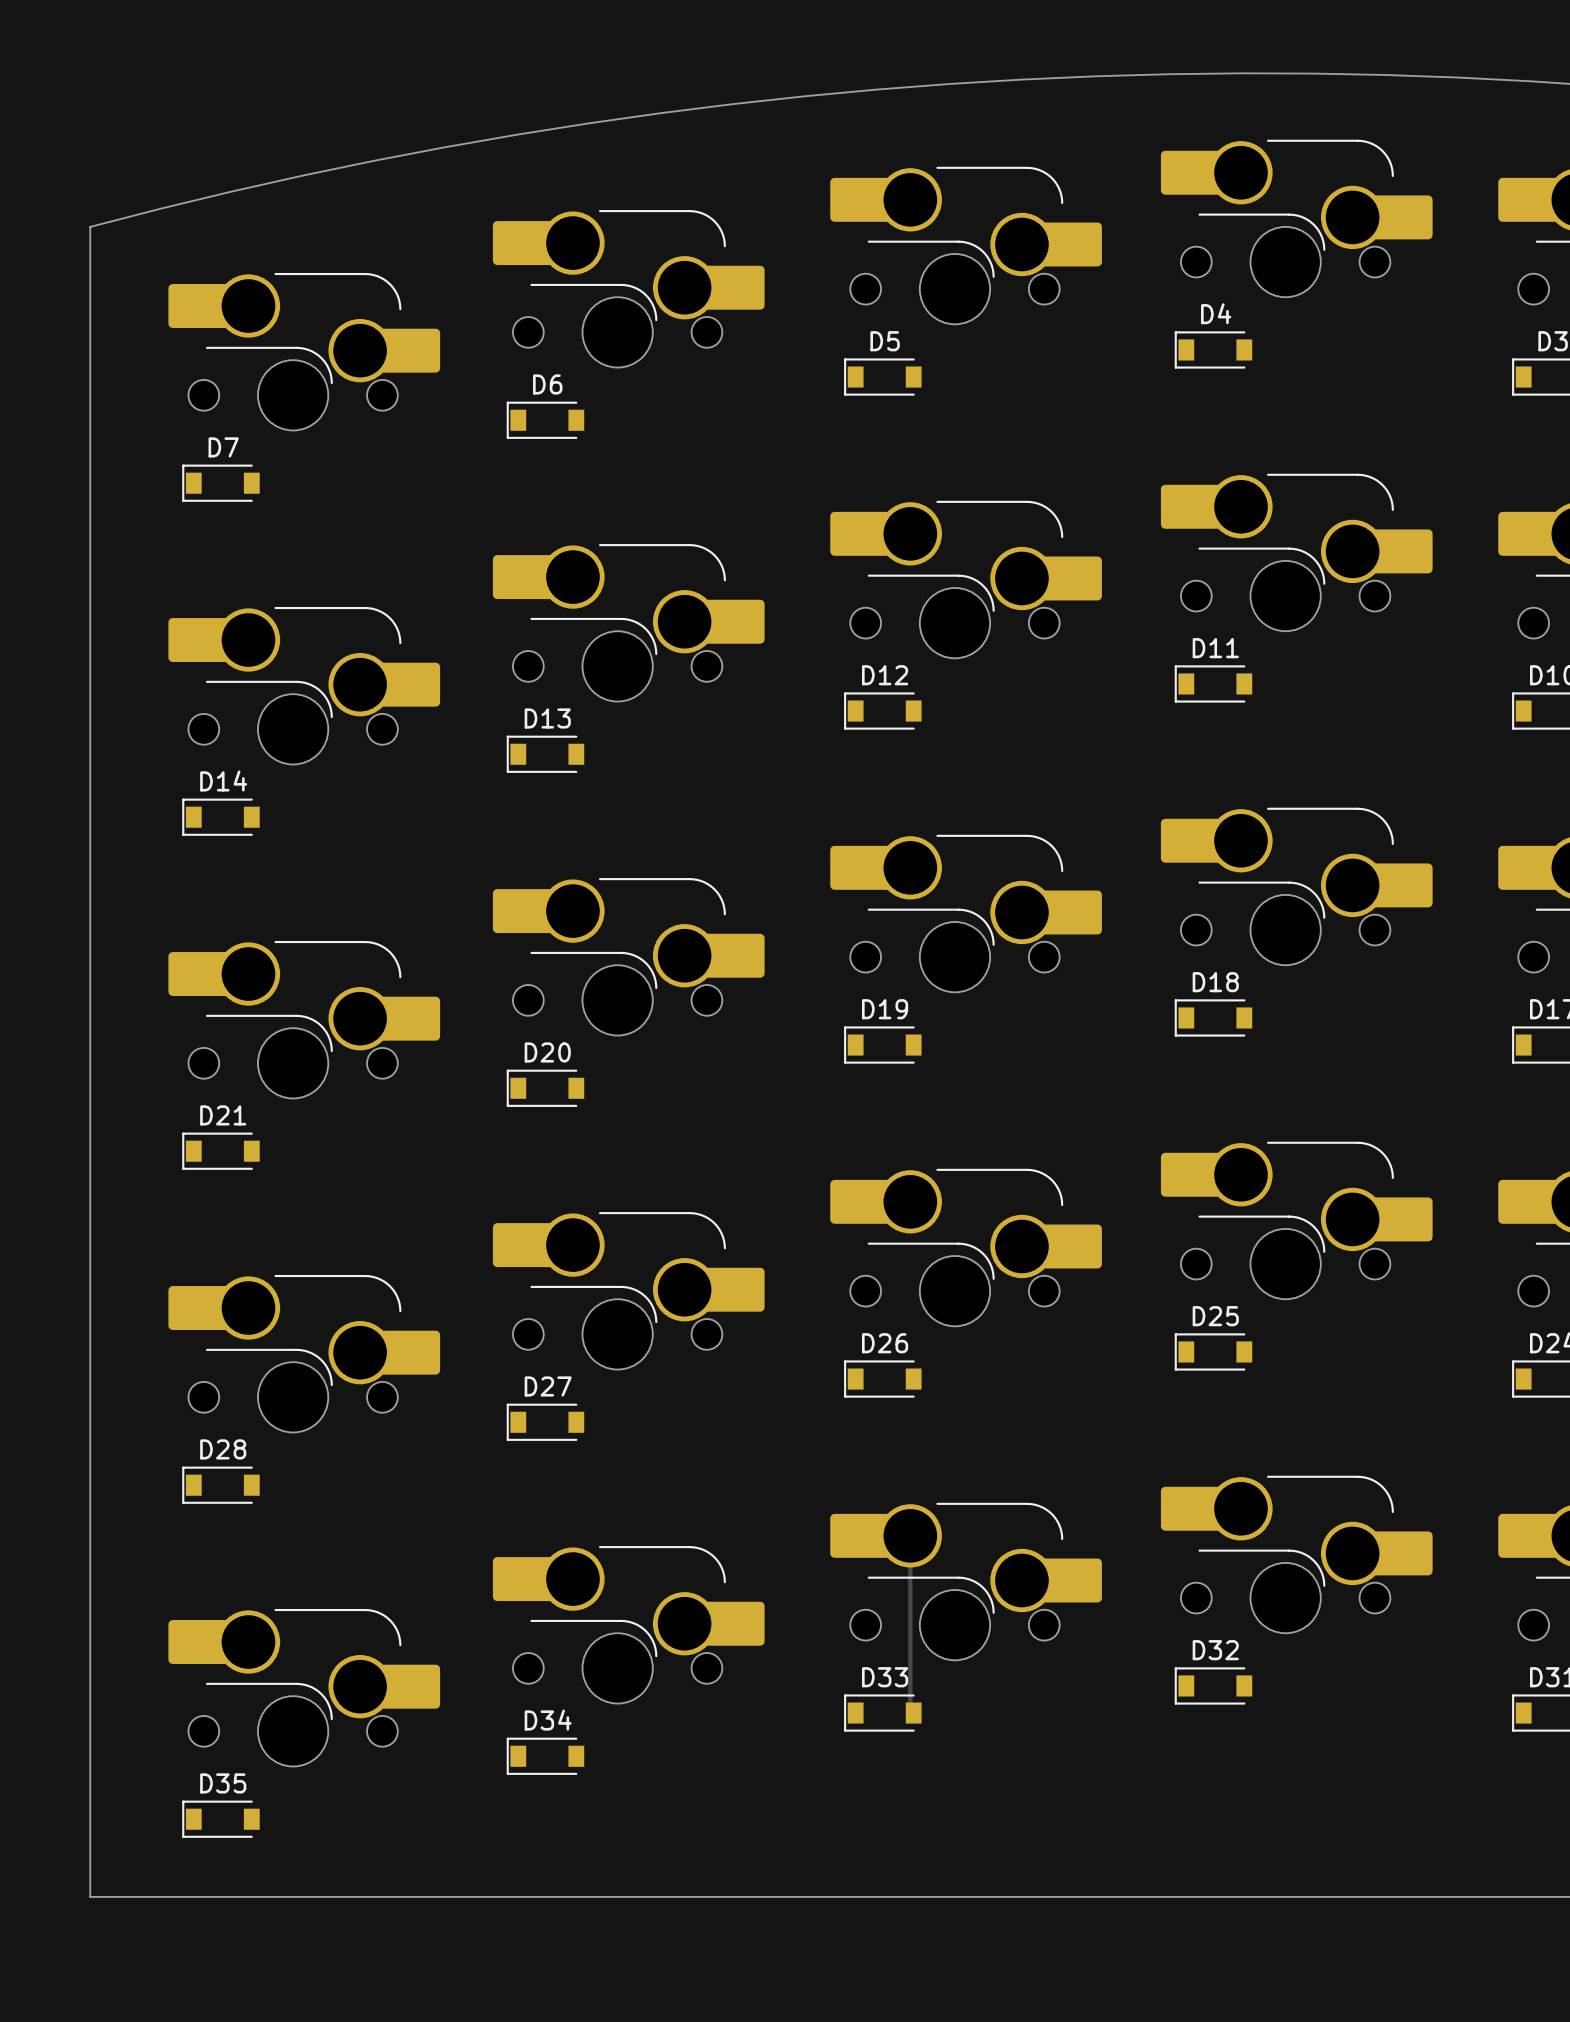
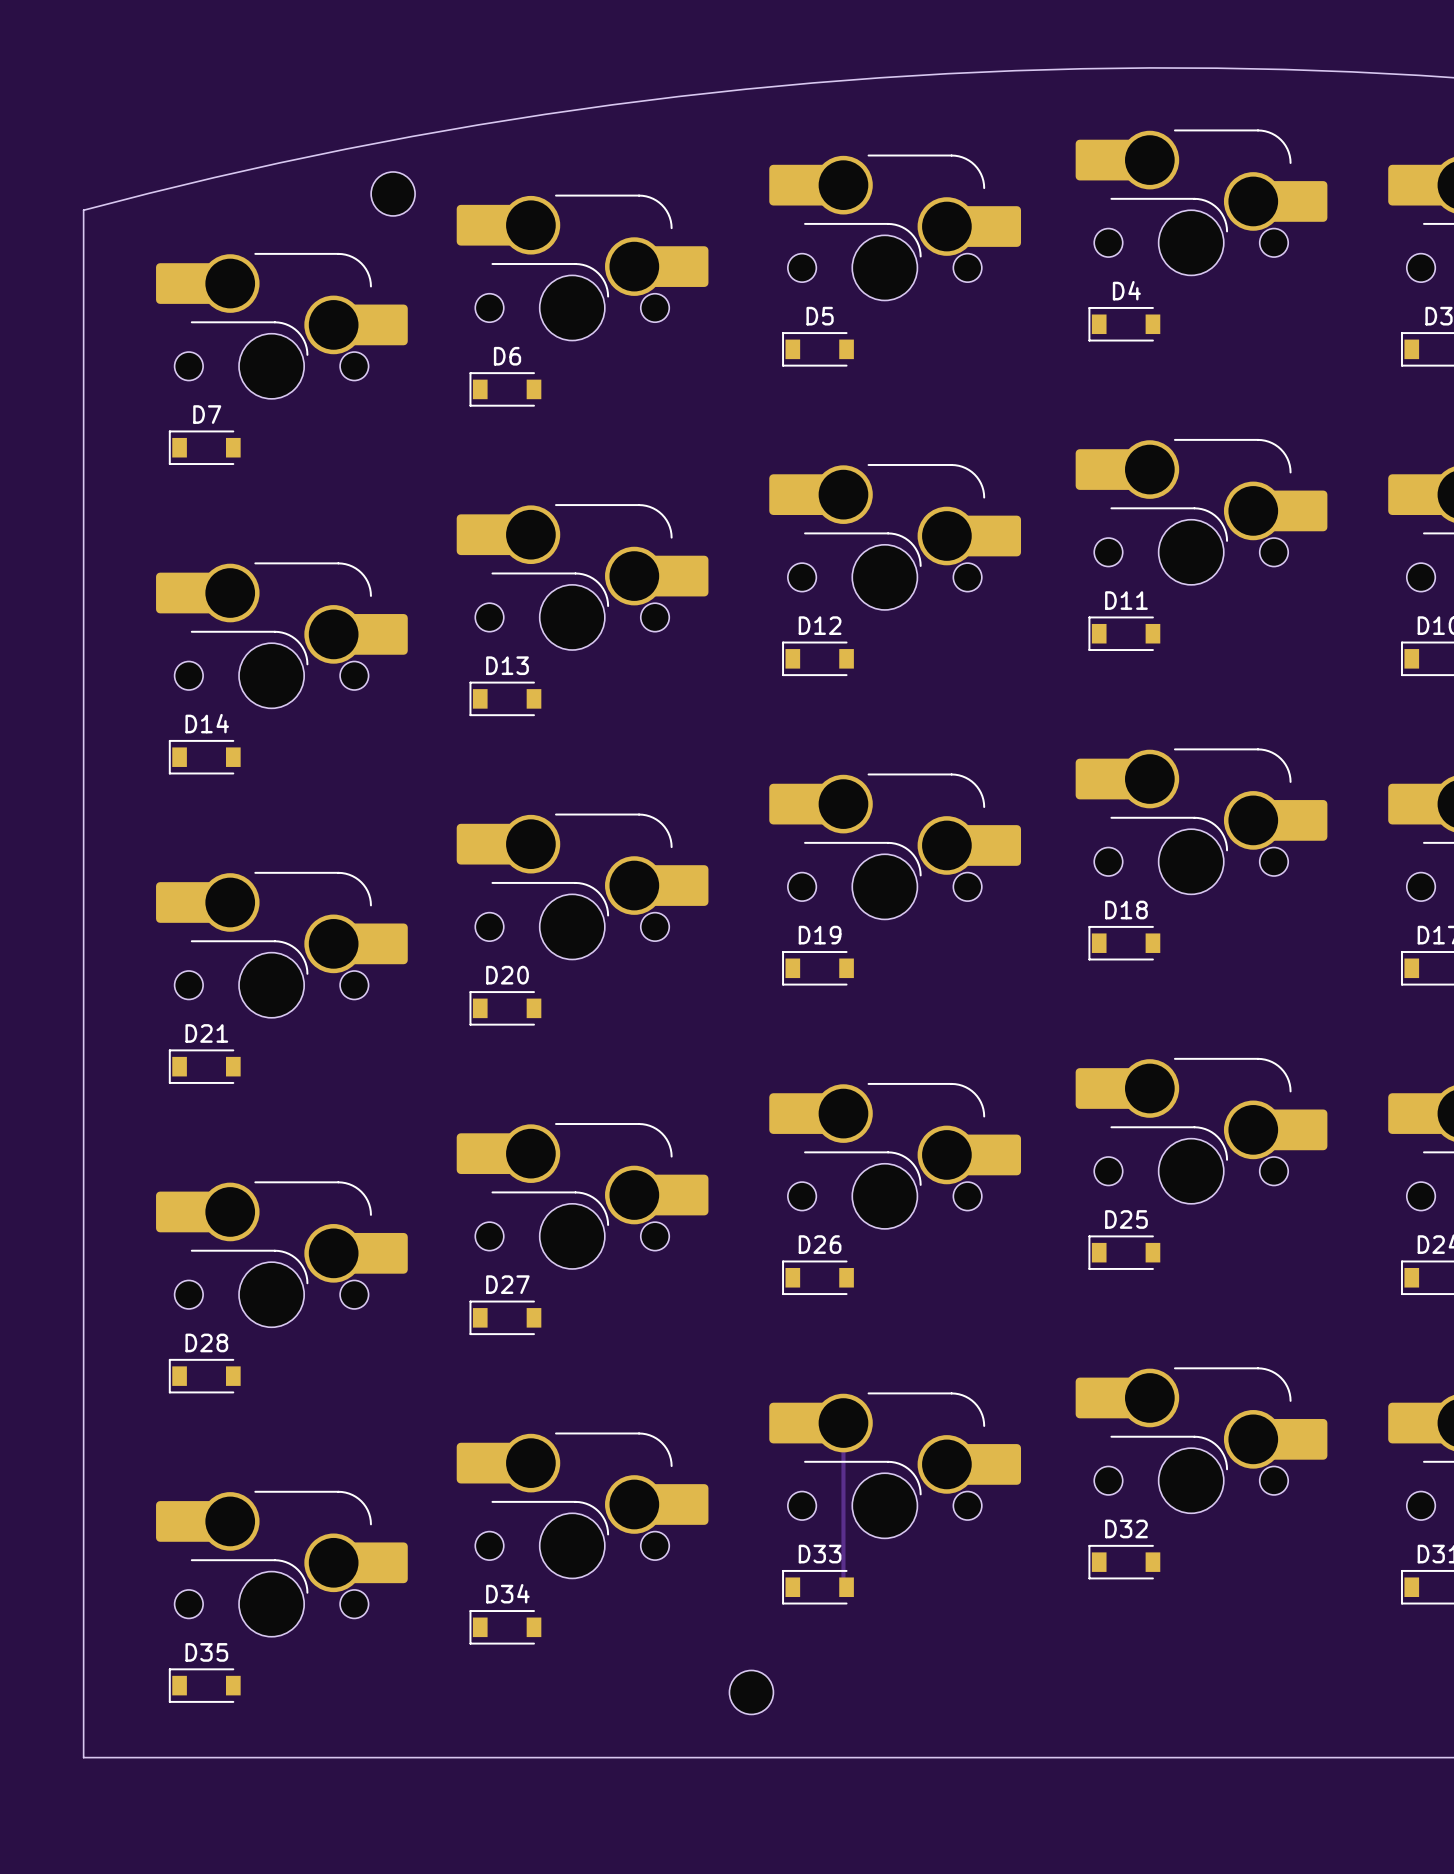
part: none -> (393, 193)
part: none -> (751, 1692)

